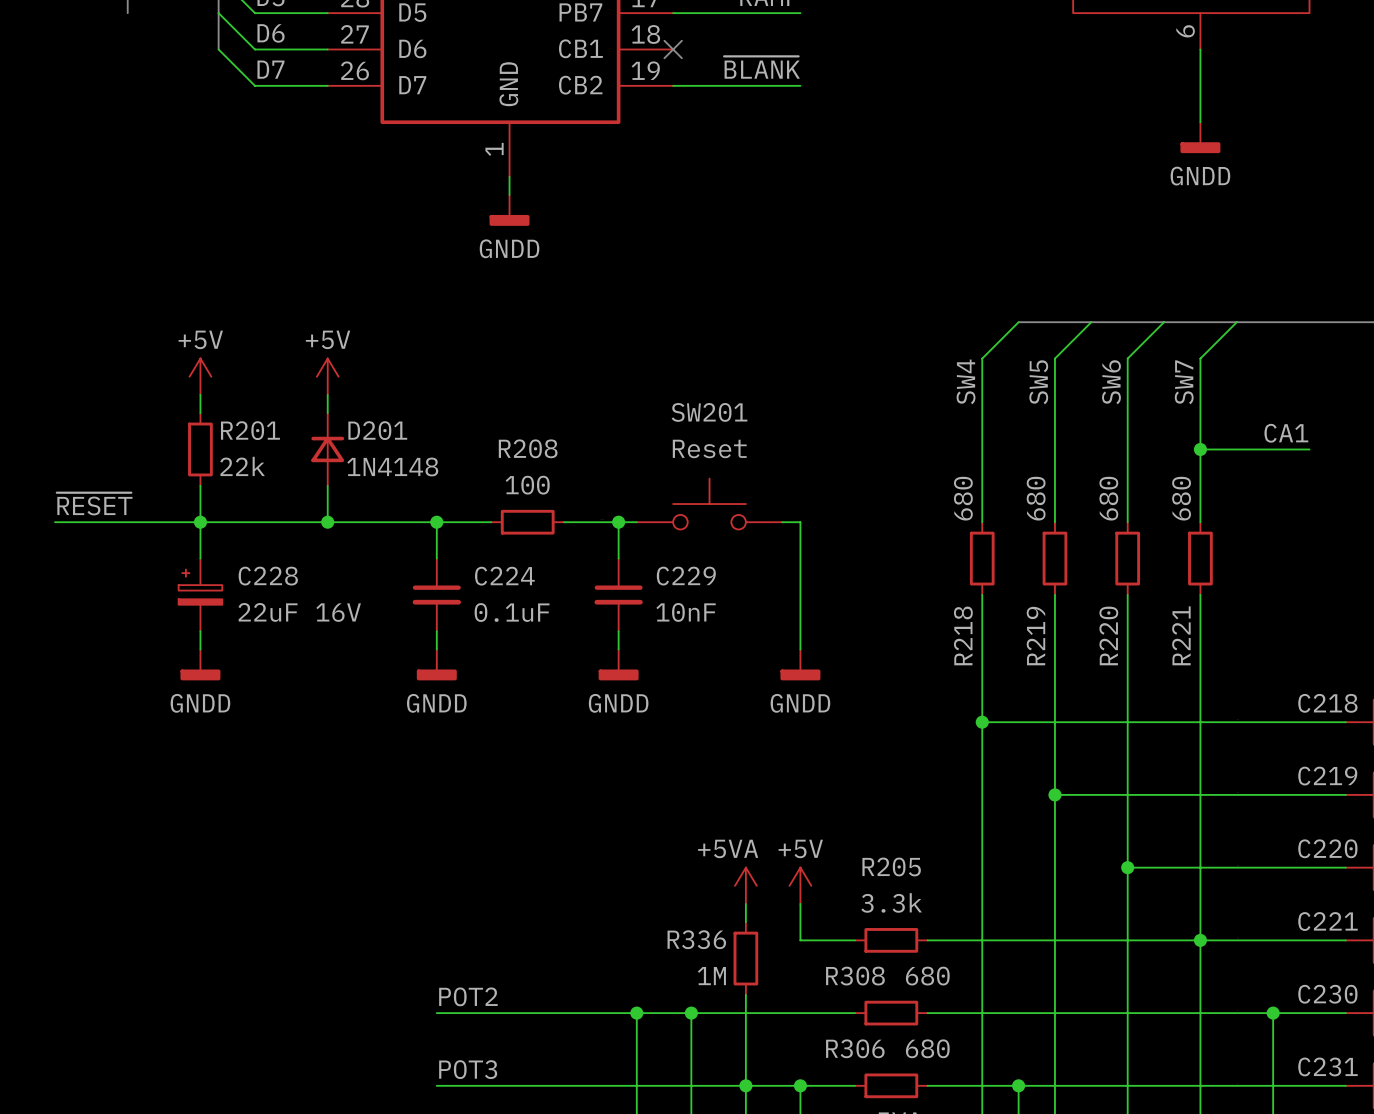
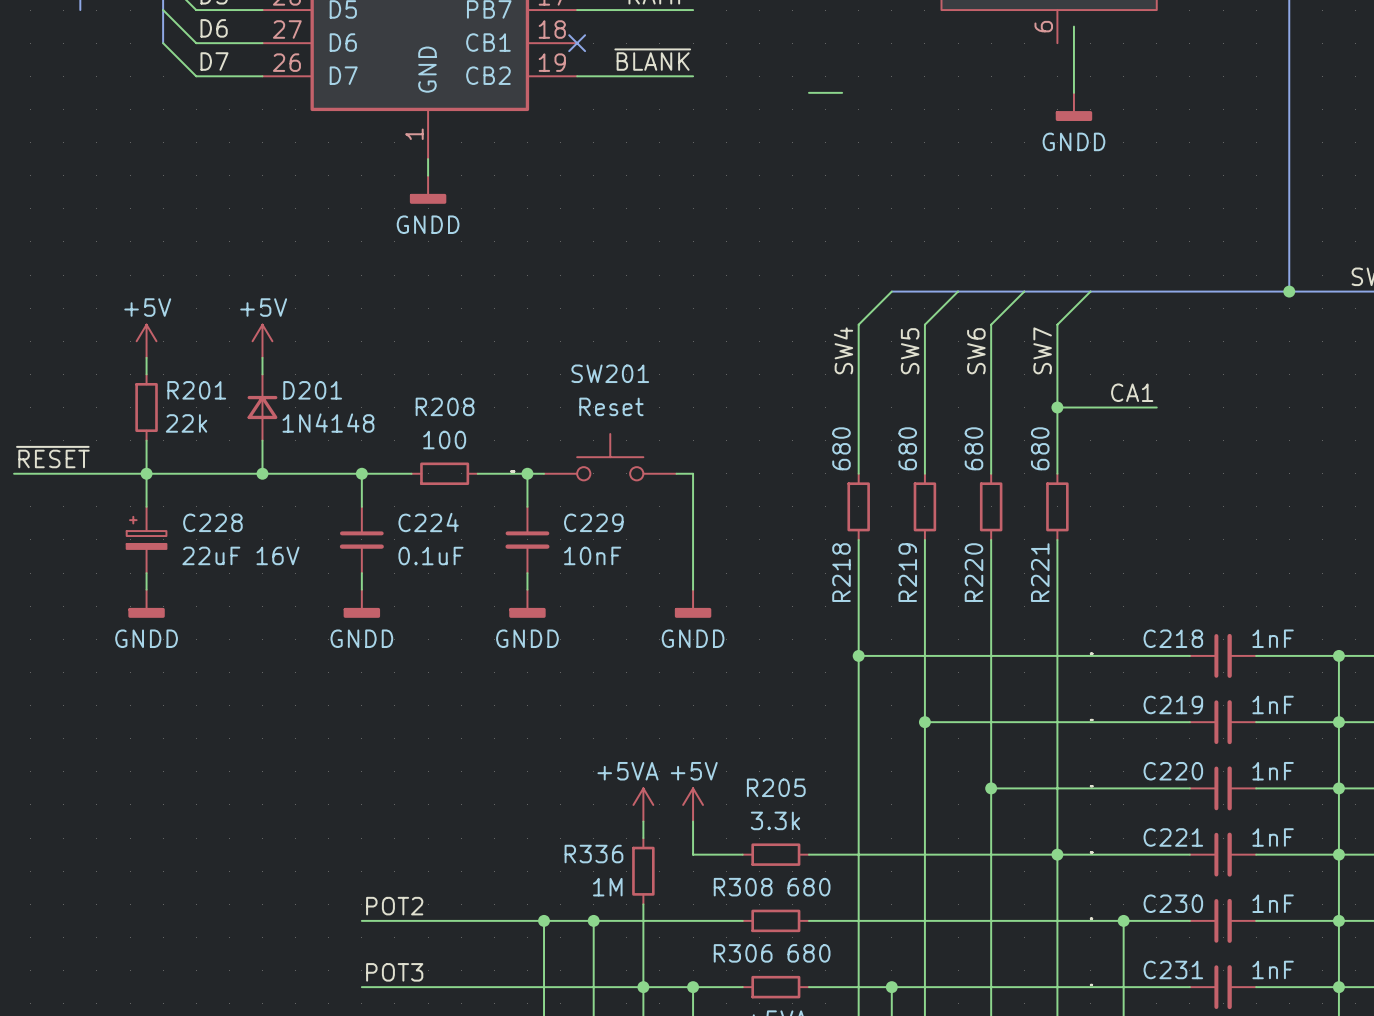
wire: (1200, 49) (1200, 122) -> (1073, 26) (1073, 92)
wire: none -> (808, 92) (842, 92)
power symbol position: GNDD (1200, 137) -> GNDD (1073, 106)

